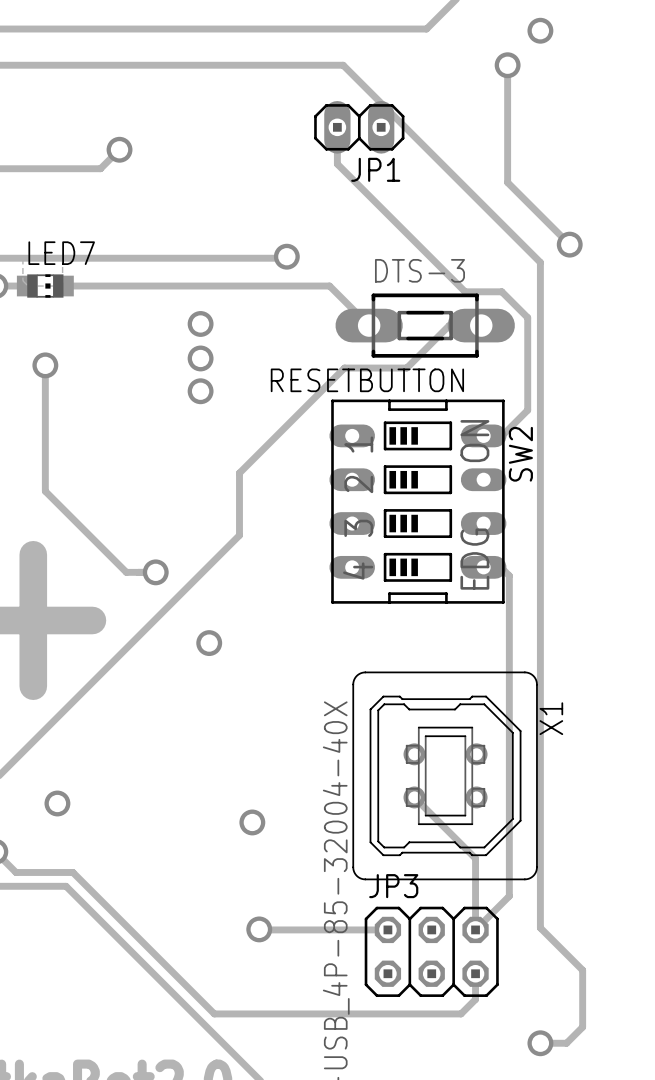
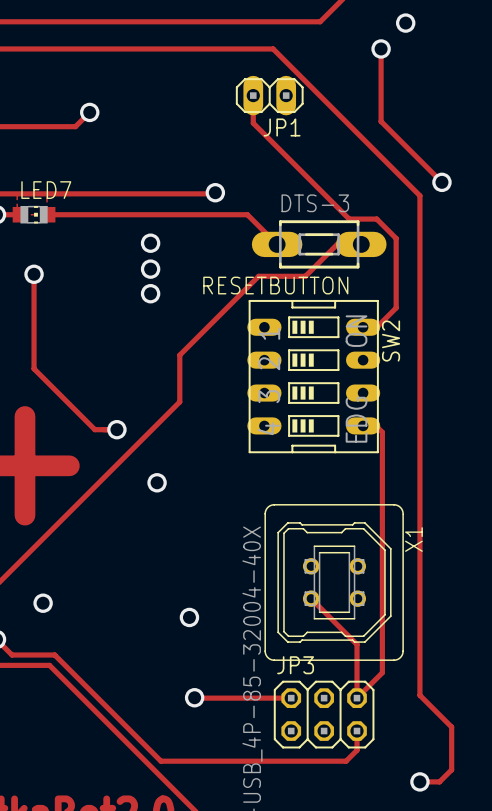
track: (343, 65) (540, 262) (540, 927) (582, 970) (582, 1027) (566, 1043) (540, 1043) -> (257, 48) (273, 48) (419, 195) (419, 695) (451, 727) (451, 769) (439, 781) (419, 781)
track: (507, 161) (507, 182) (569, 244) -> (381, 121) (441, 182)
via position: (569, 244) -> (441, 182)
via position: (540, 1043) -> (419, 781)

